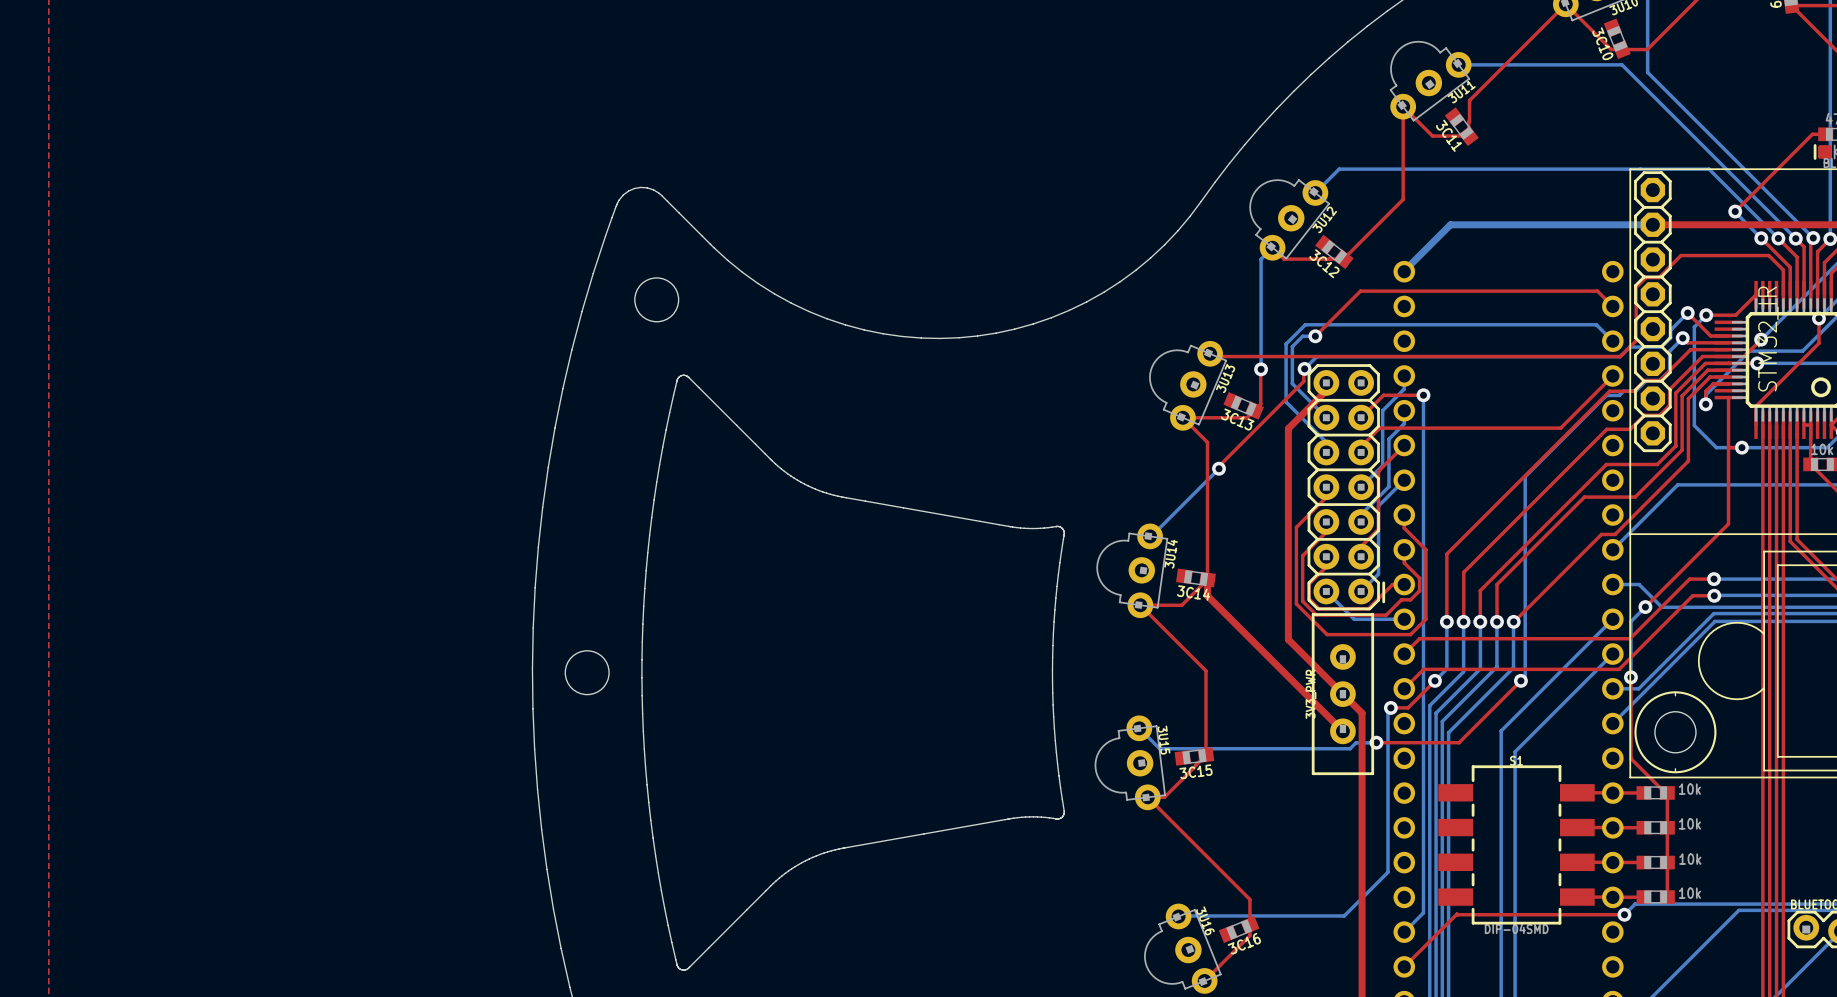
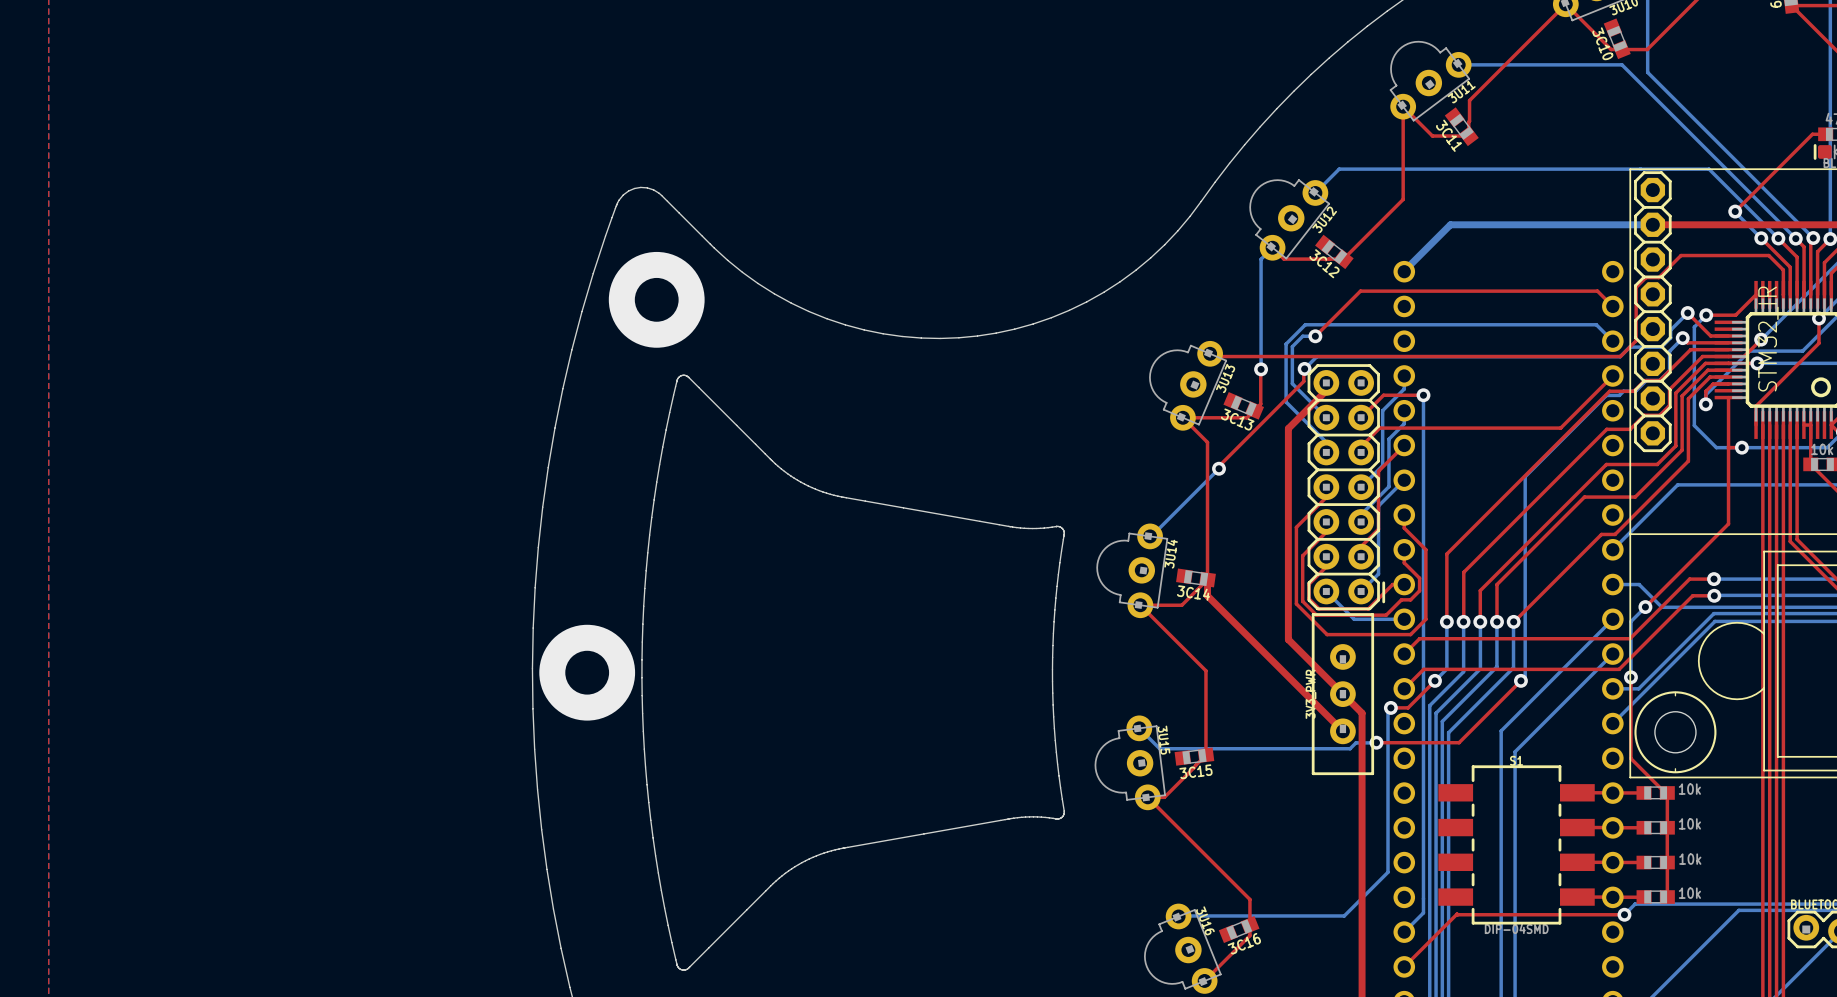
round board edge: [634, 277, 679, 322] -> none
via: none -> (656, 299)
round board edge: [565, 650, 610, 695] -> none
via: none -> (587, 672)

